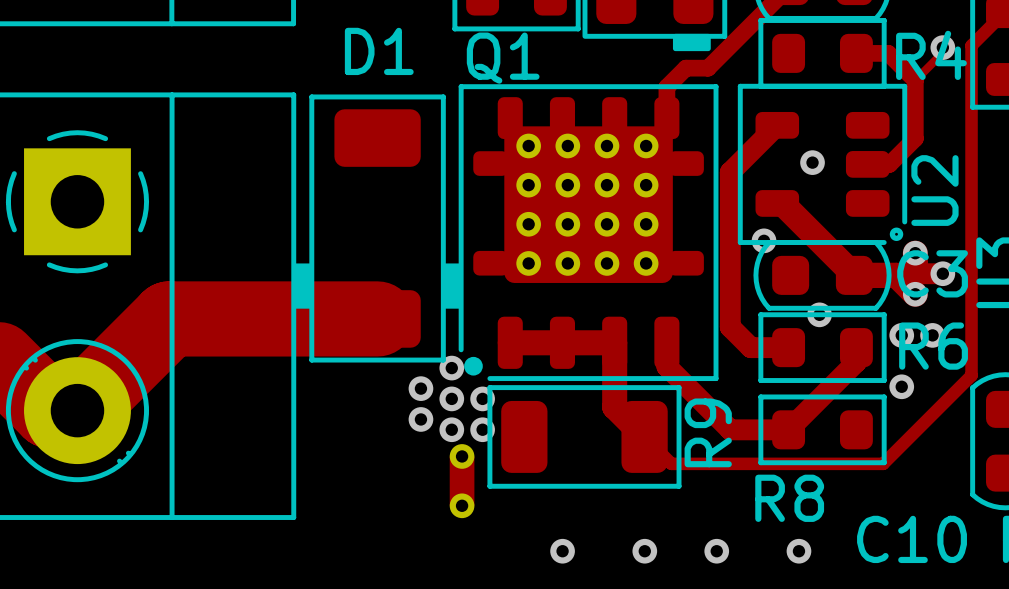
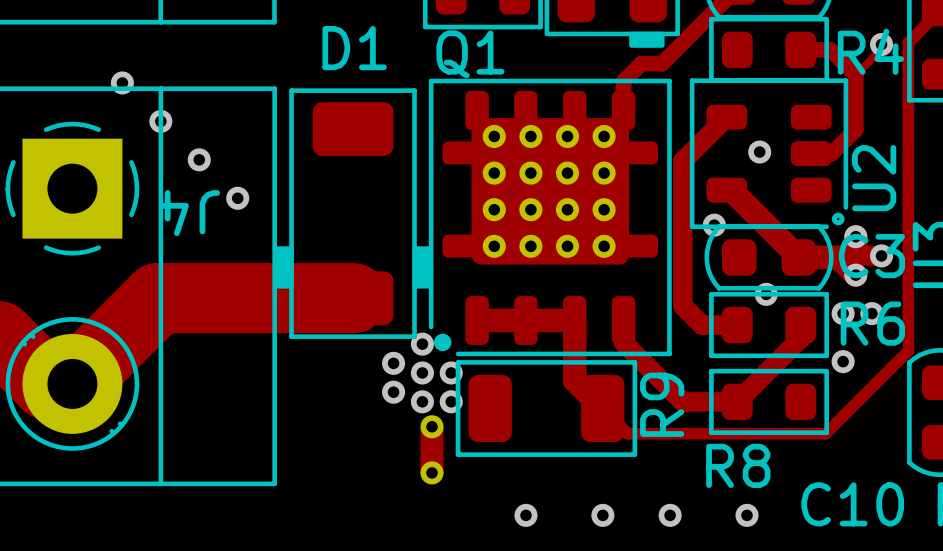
via: none -> (122, 82)
via: none -> (160, 121)
via: none -> (199, 159)
via: none -> (237, 198)
text: none -> J4 (189, 213)

